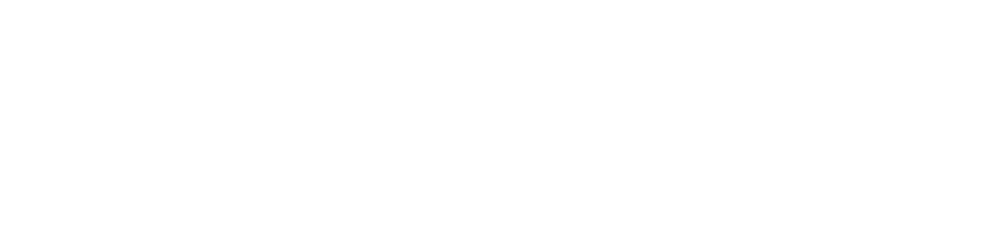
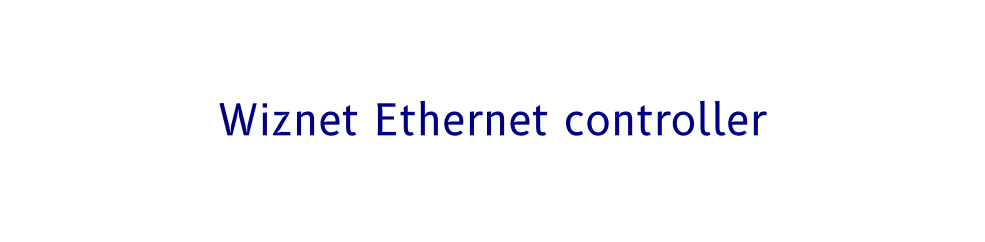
text: none -> Wiznet Ethernet controller (493, 118)

